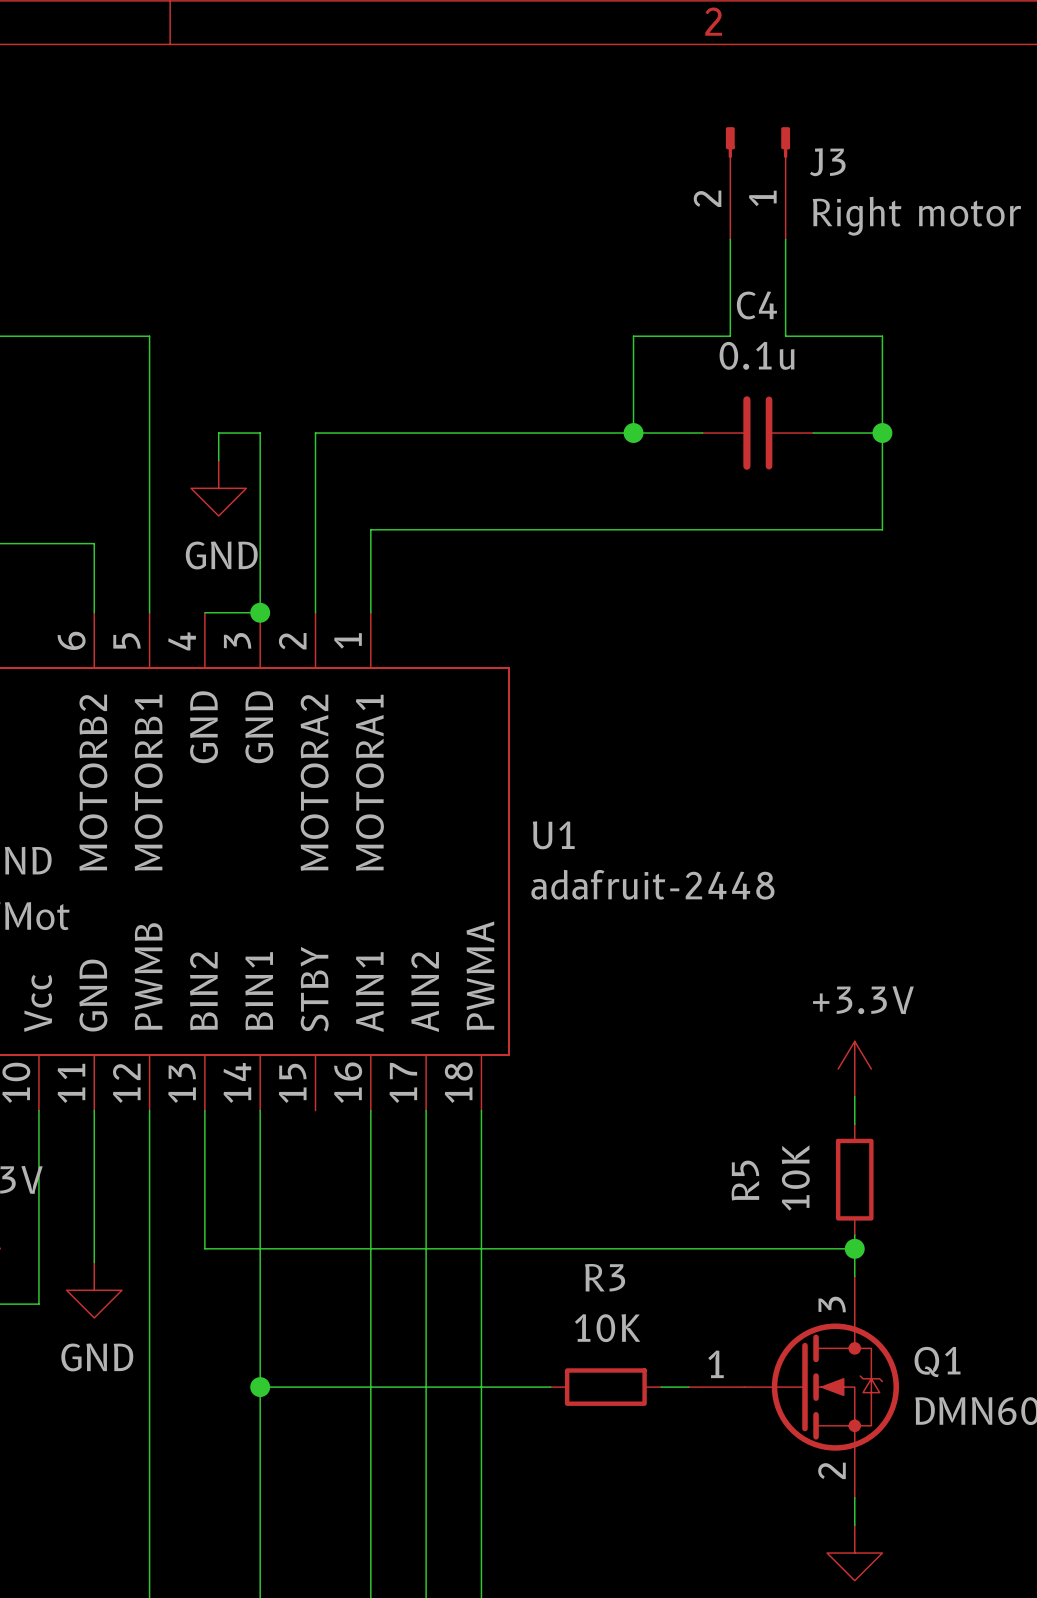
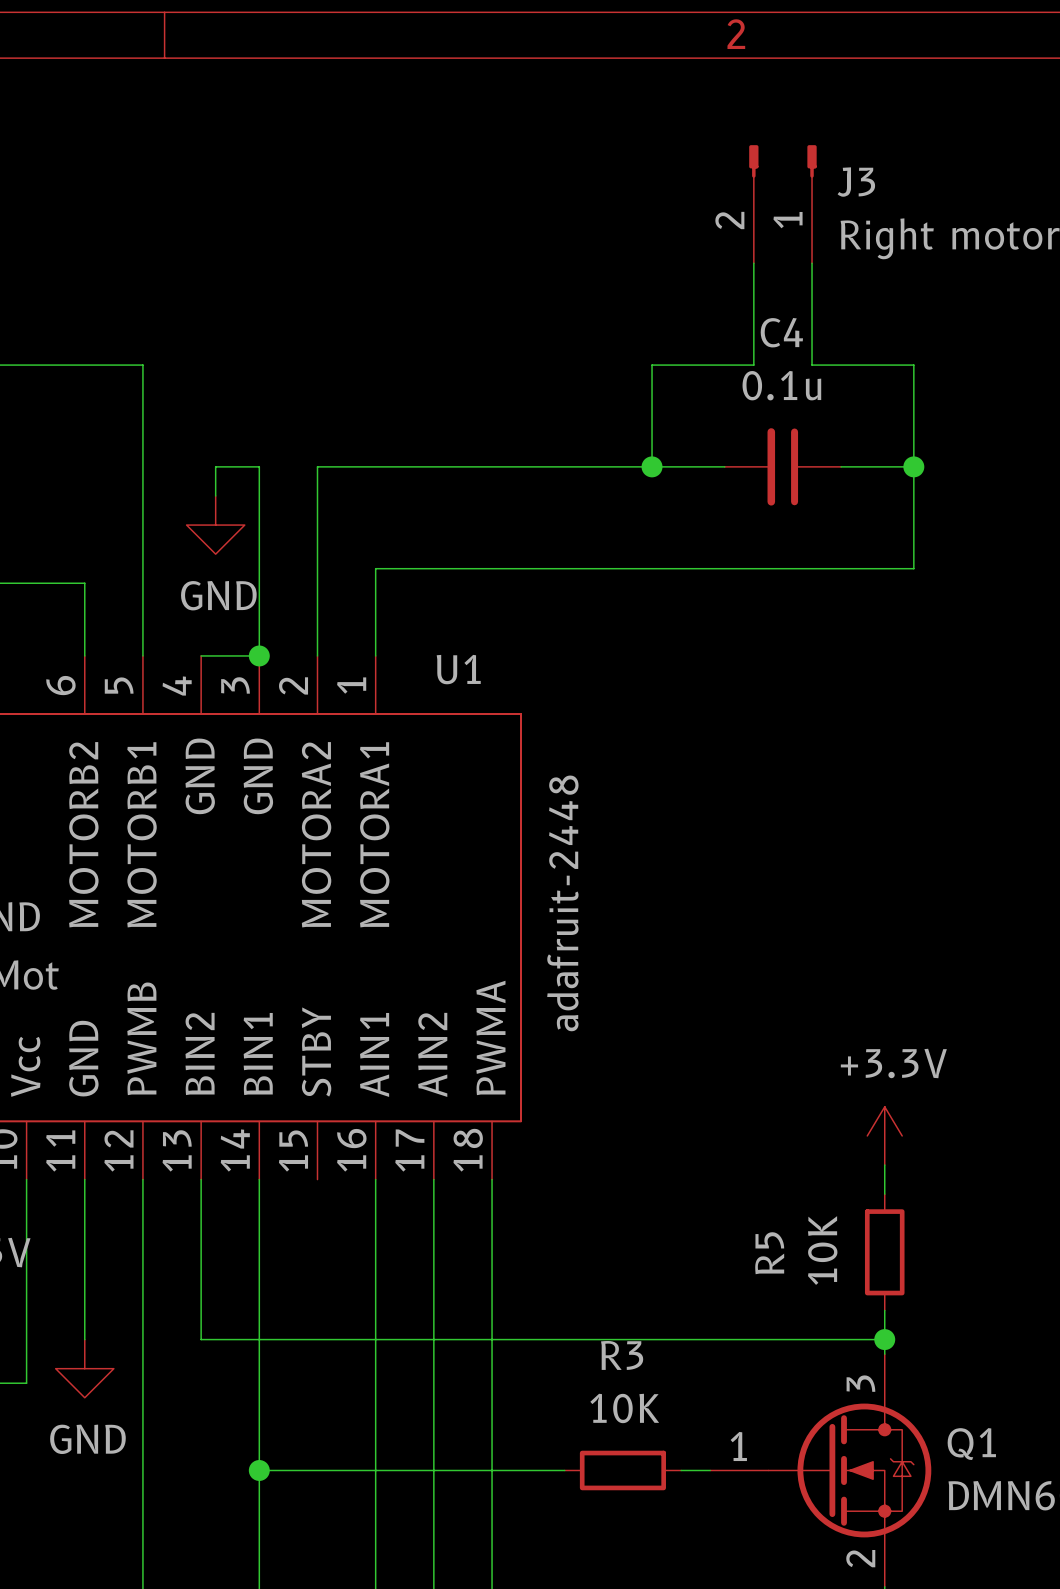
U1 name position: U1 (553, 835) -> U1 (458, 669)
U1 value rotation: 0° (652, 884) -> 90° counterclockwise (562, 903)
wire: (204, 1248) (854, 1248) -> (201, 1325) (201, 1339) (884, 1339)
junction position: (854, 1248) -> (884, 1339)

